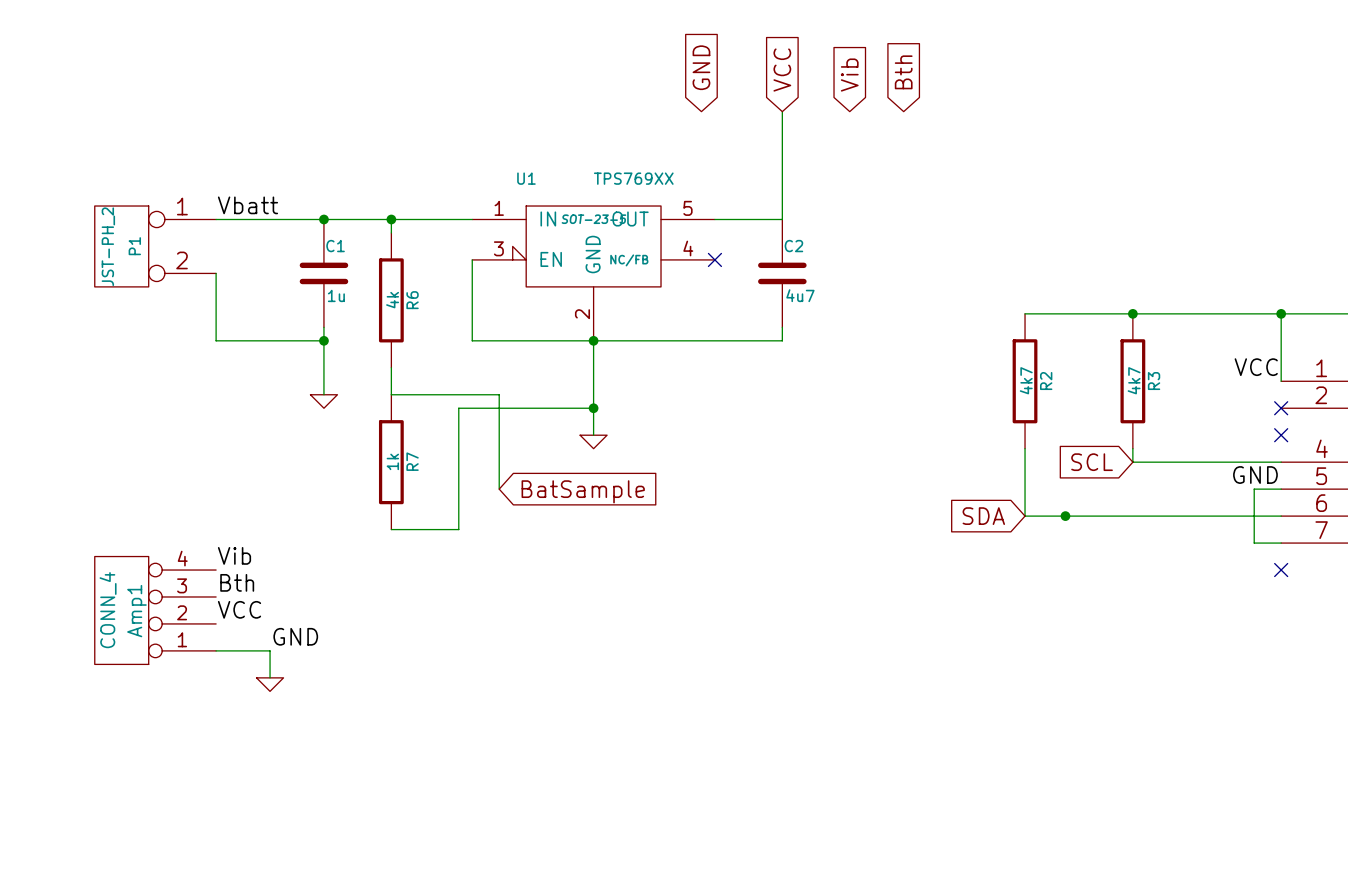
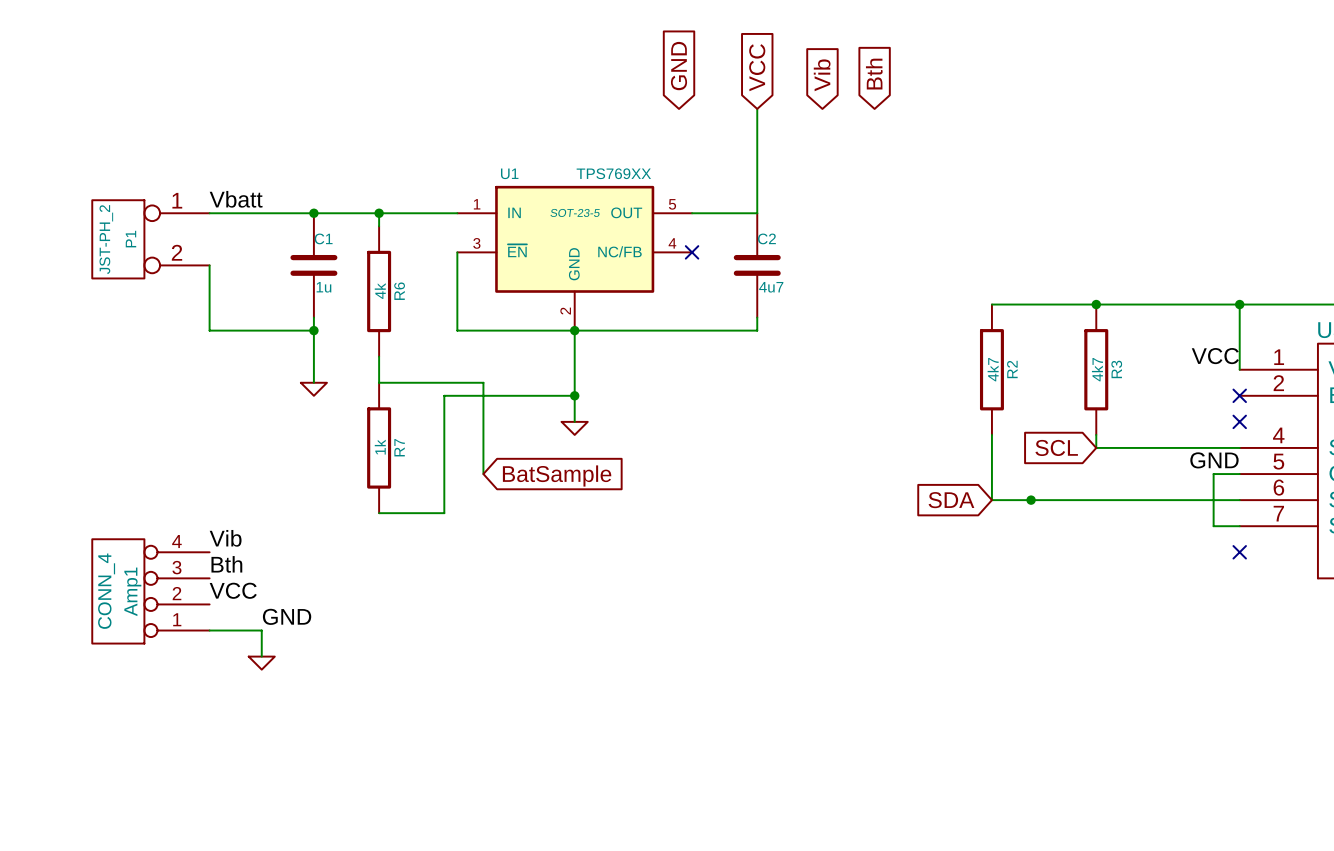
U1 symbol: [472, 206, 715, 341] -> [457, 185, 693, 331]

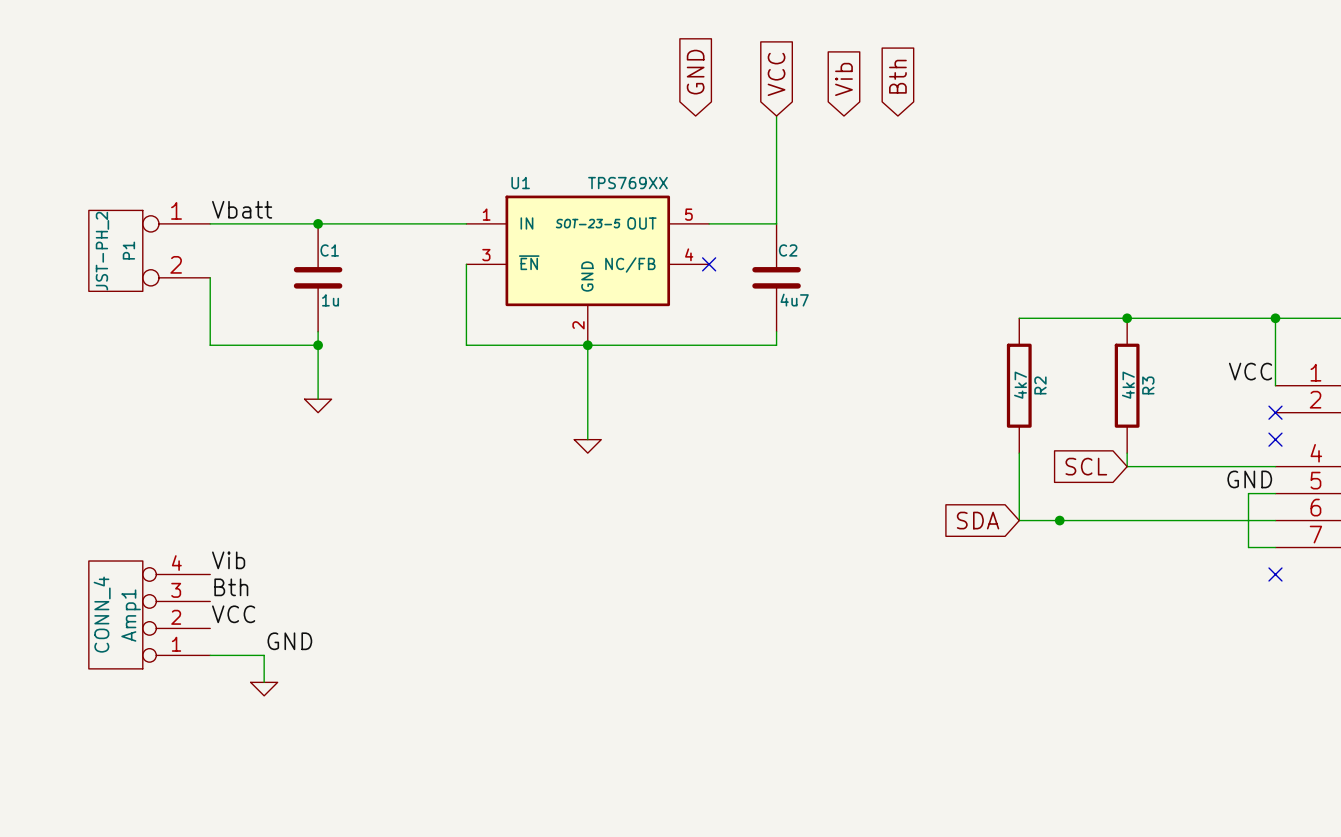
wire: (379, 213) (379, 226) -> none
junction: (379, 213) -> none
R6: 4k (379, 291) -> none
wire: (379, 356) (379, 382) (483, 382) (483, 474) -> none
wire: (574, 395) (444, 395) (444, 513) (379, 513) -> none
junction: (574, 395) -> none
R7: 1k (379, 447) -> none
global label: BatSample (557, 475) -> none

